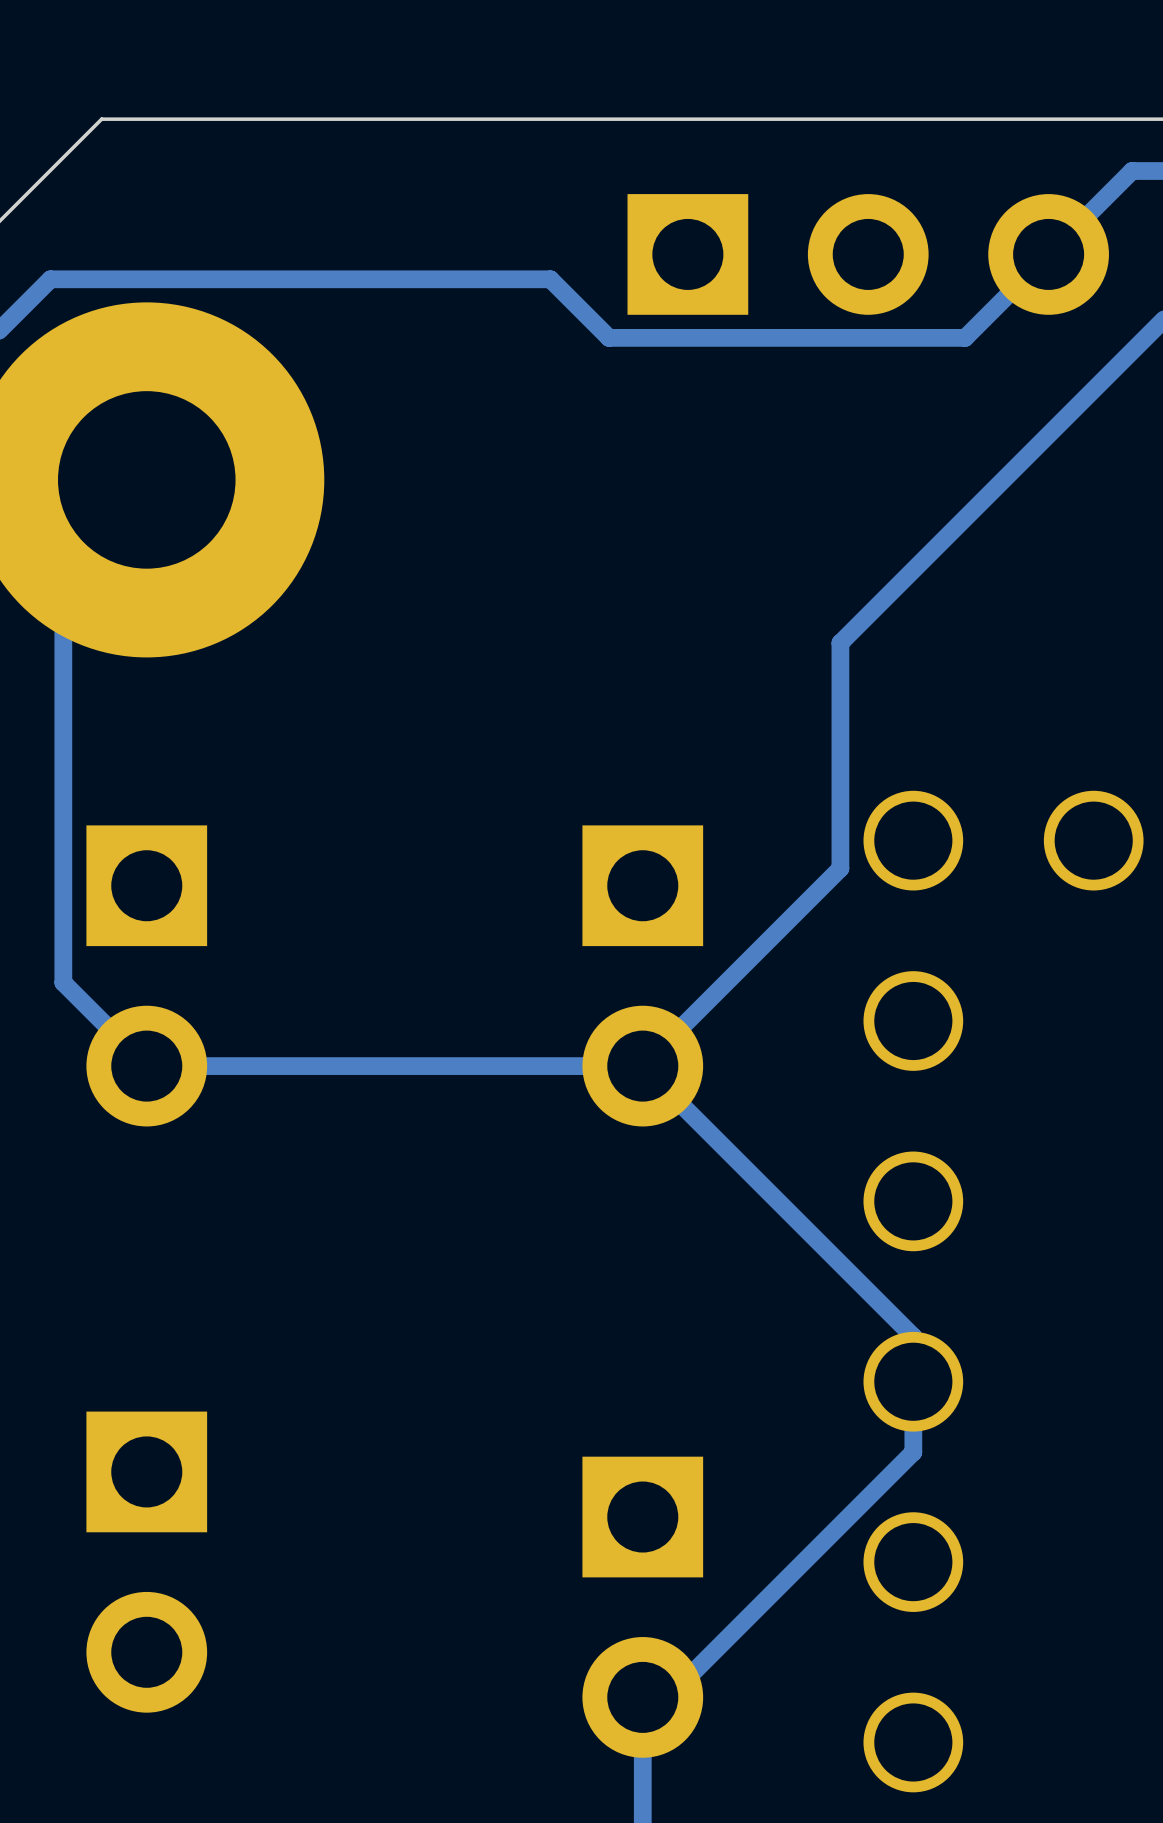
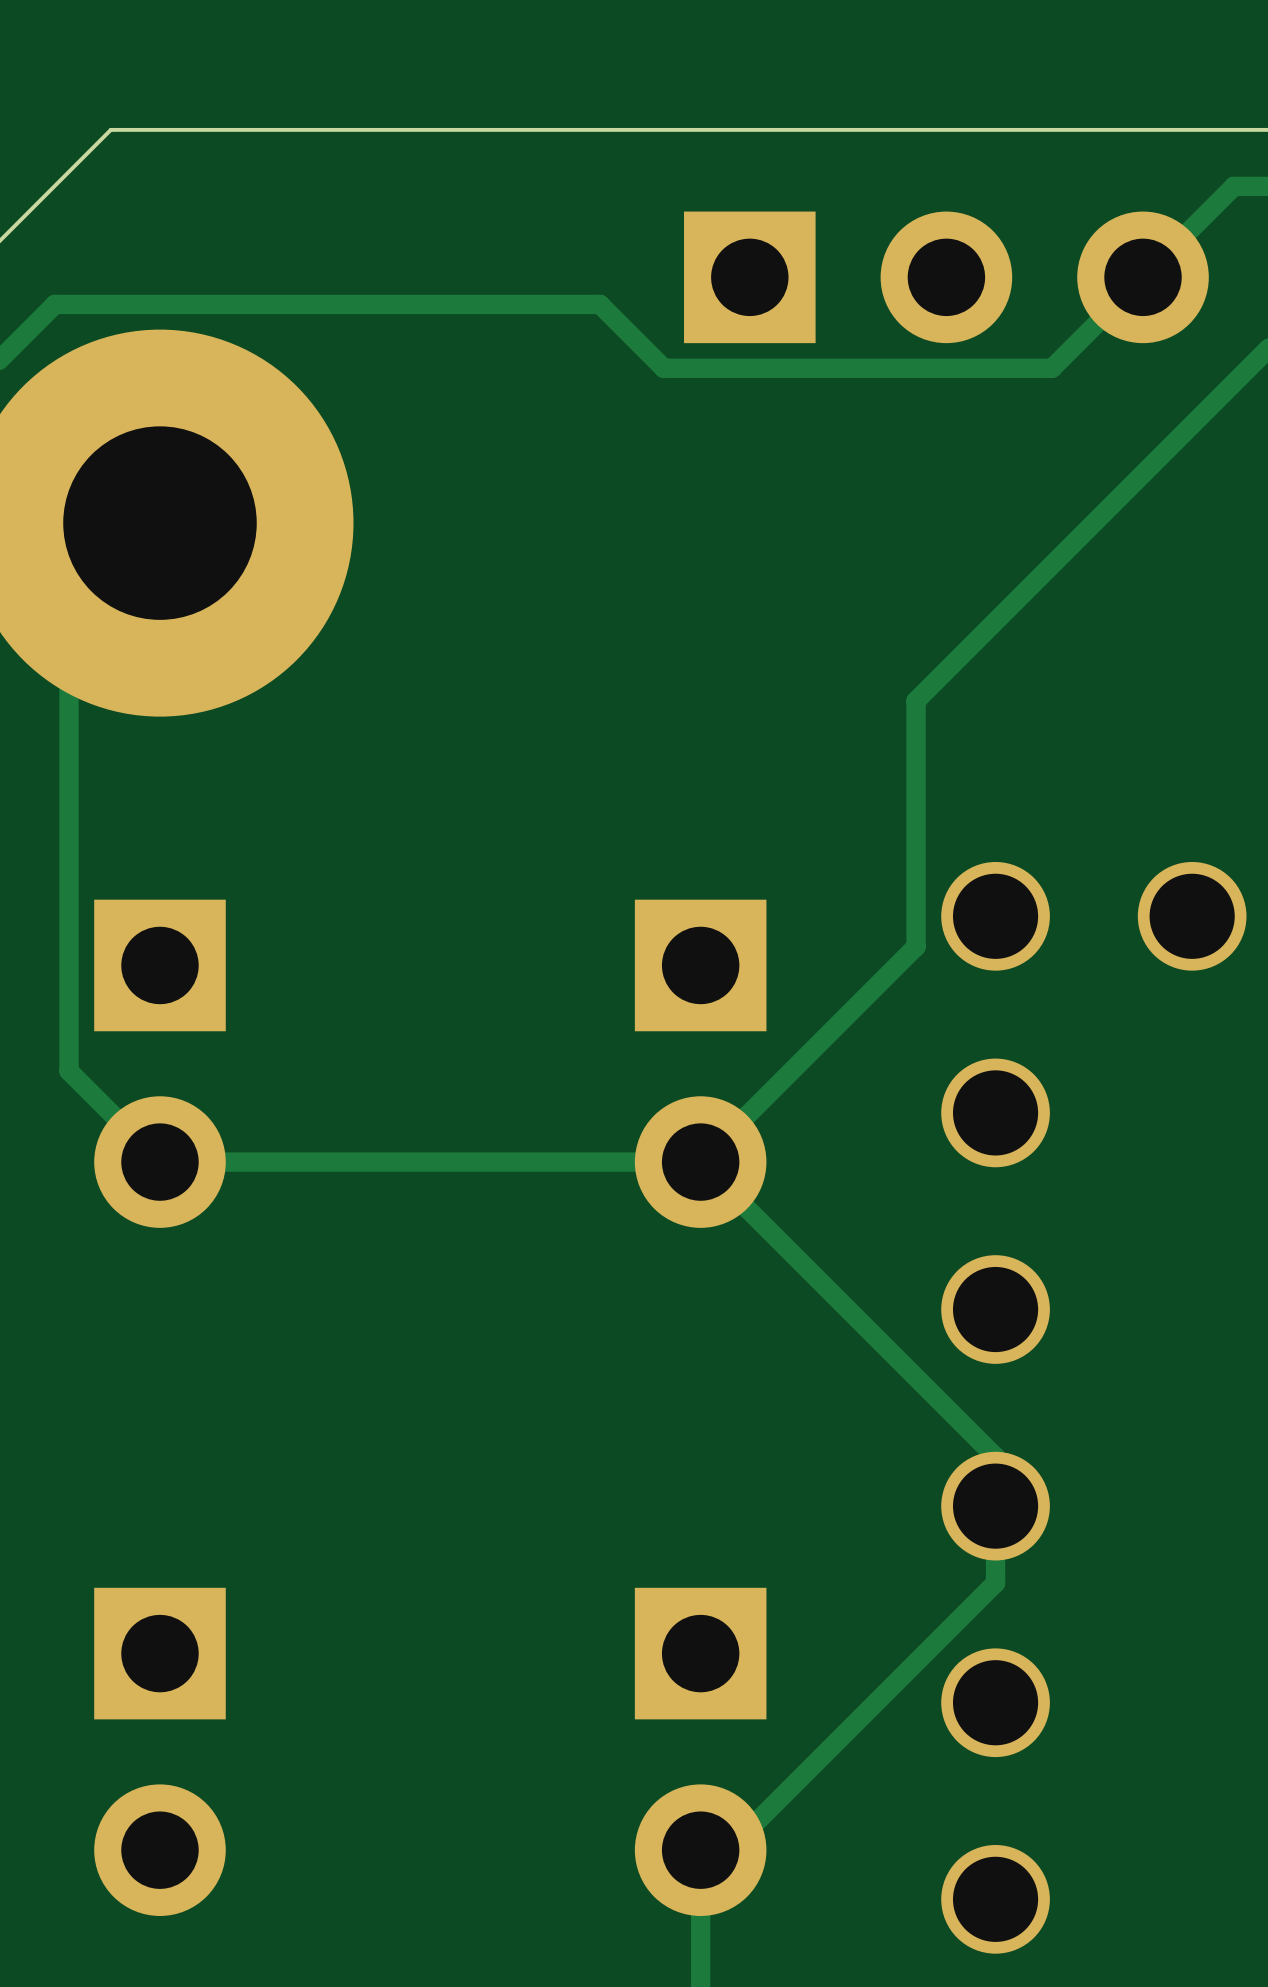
part position: (146, 1562) -> (159, 1751)

